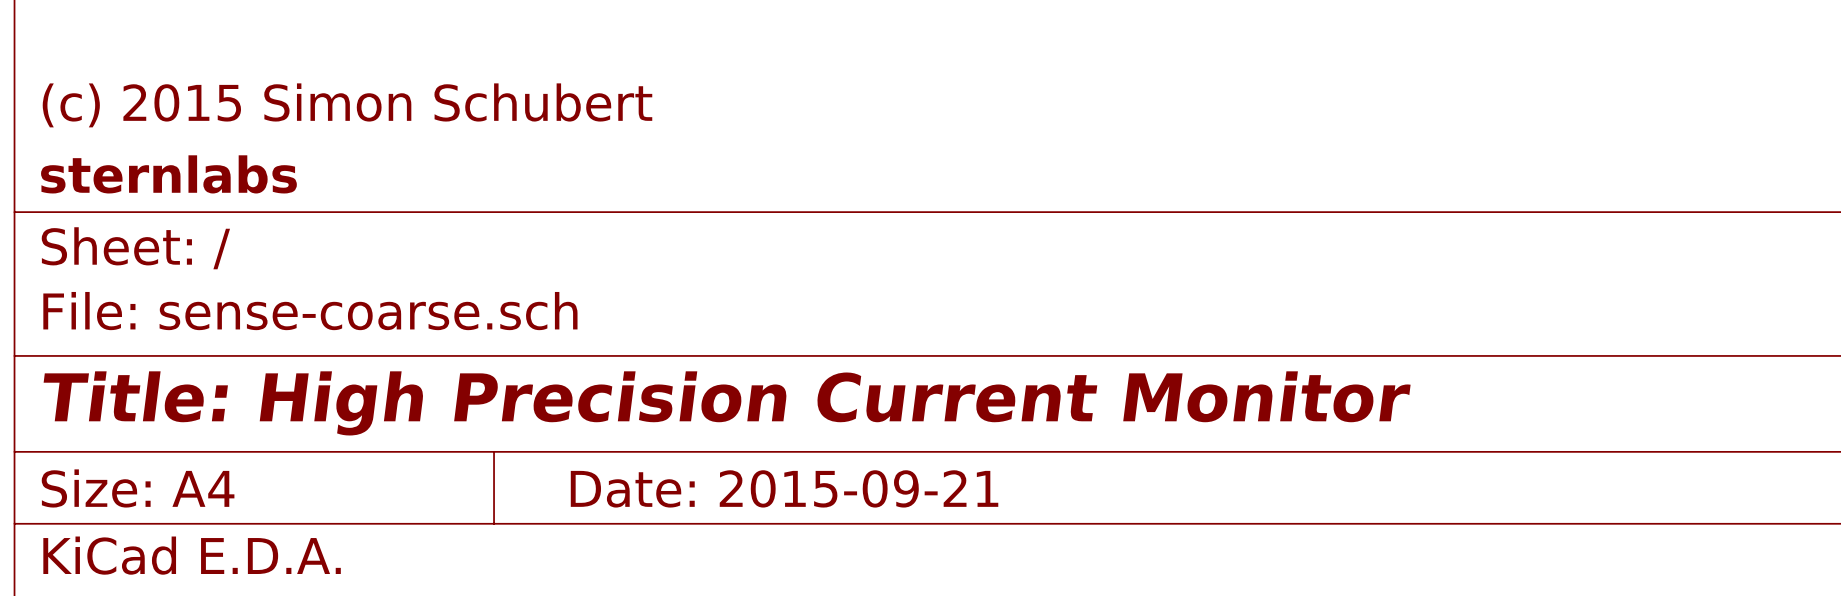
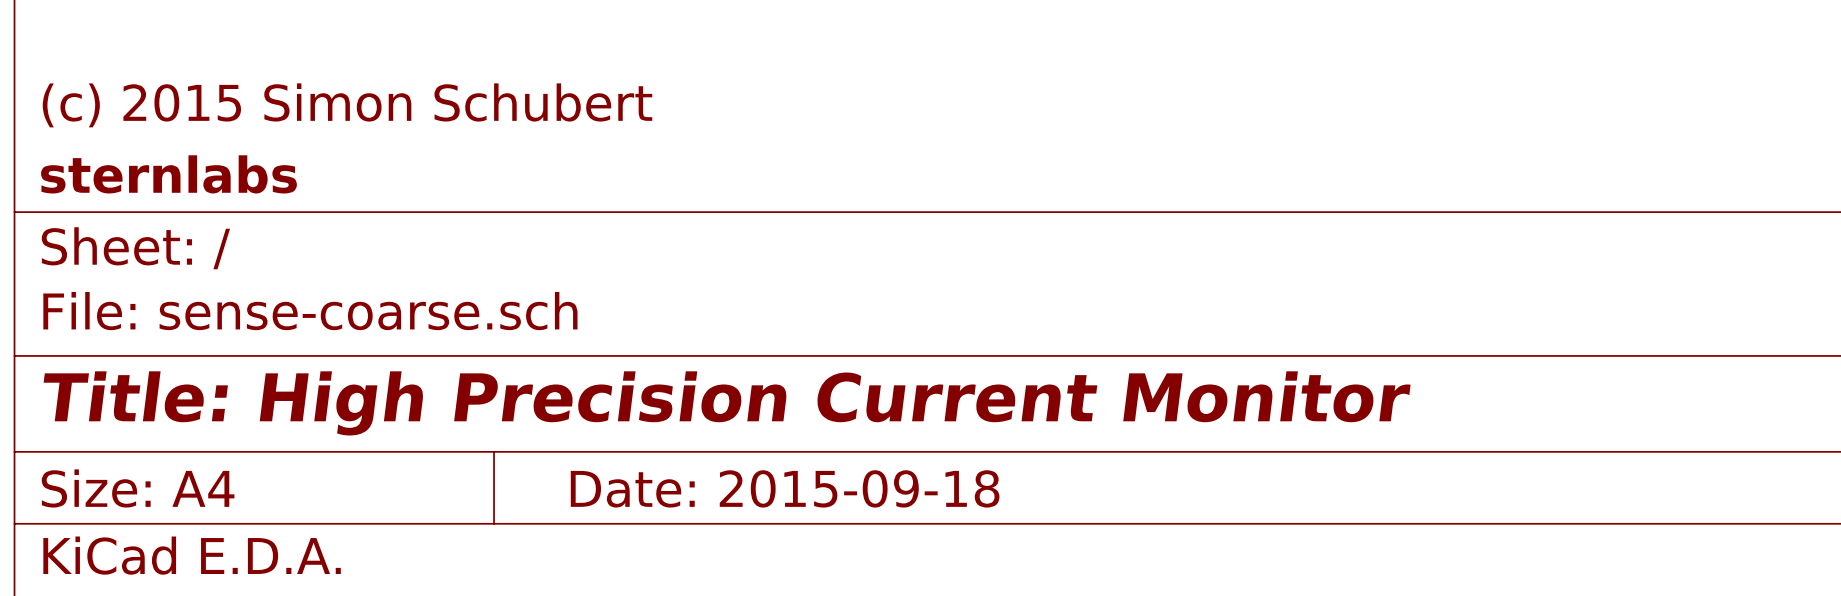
title block: Date: 2015-09-21 (784, 488) -> Date: 2015-09-18 (785, 488)

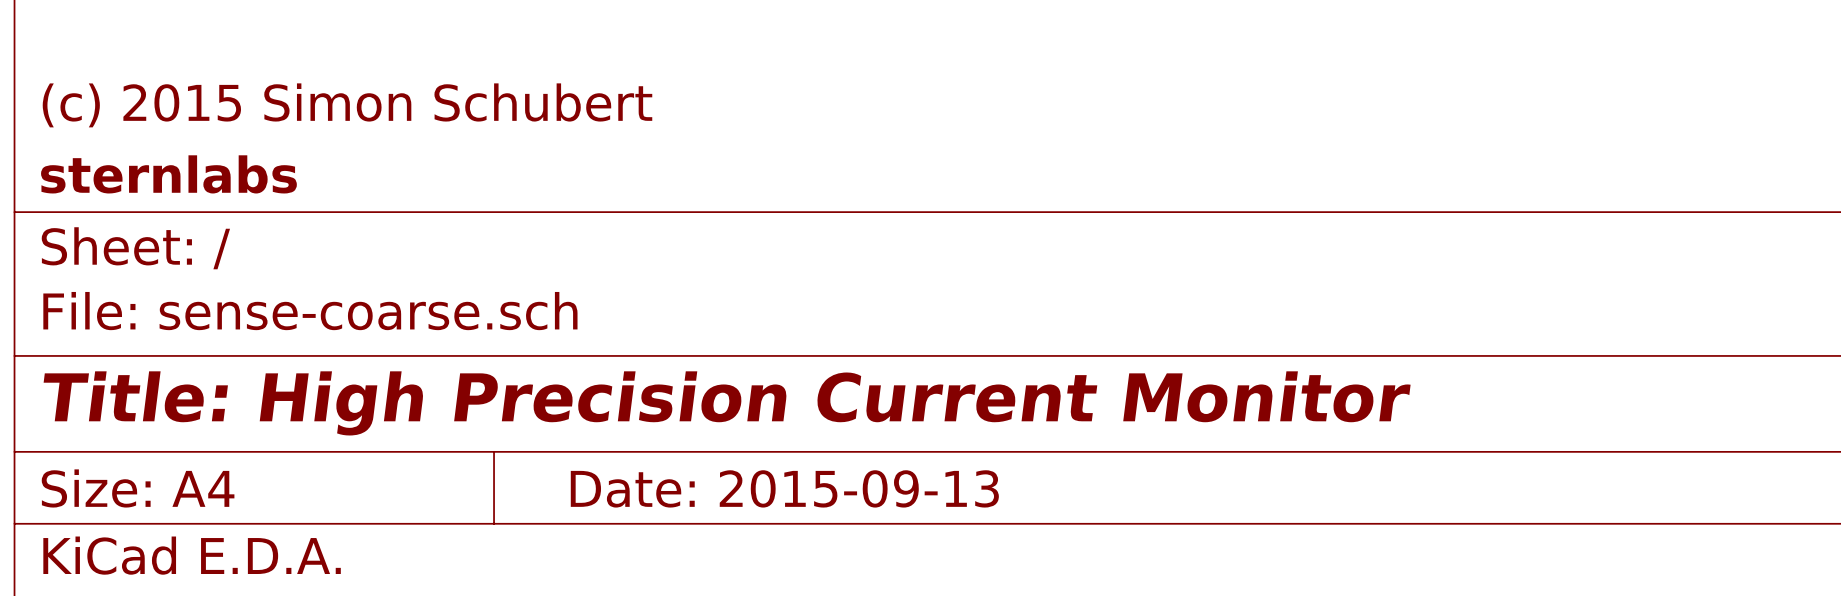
title block: Date: 2015-09-18 (785, 488) -> Date: 2015-09-13 (784, 488)

